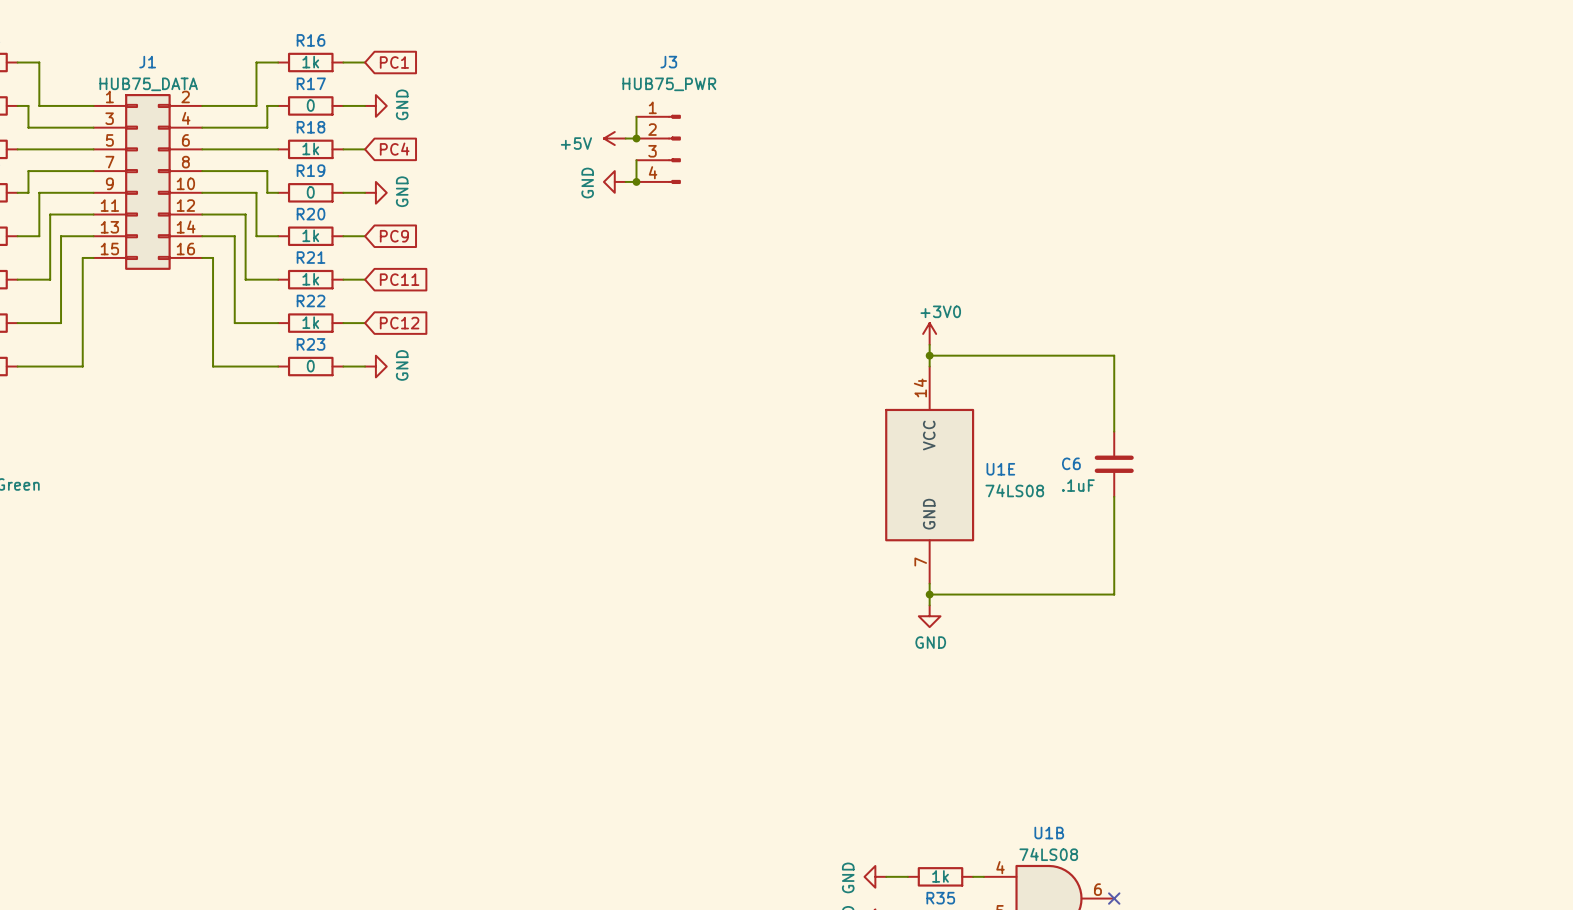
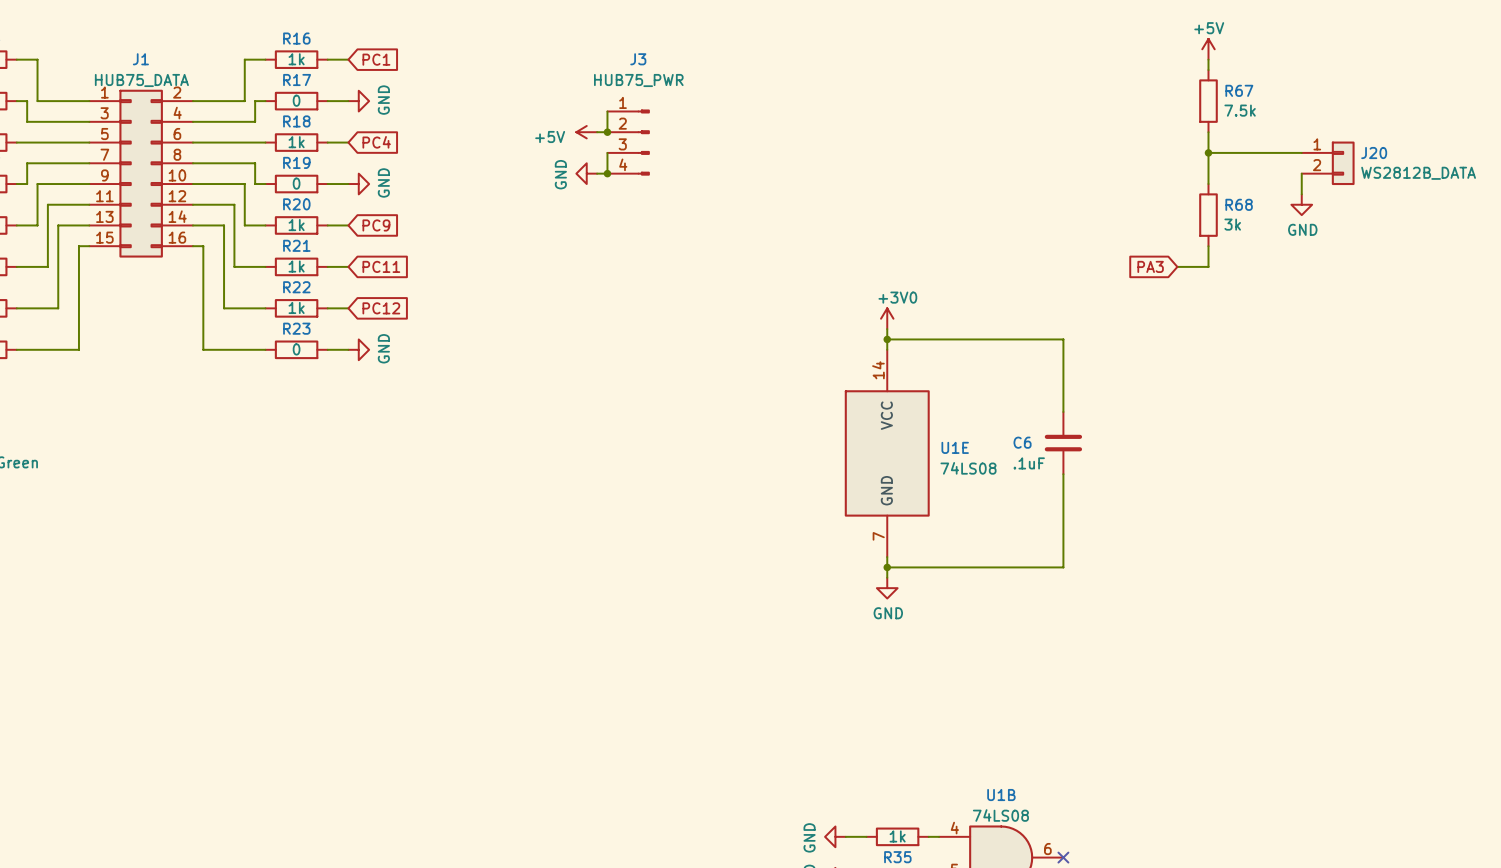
power symbol: none -> +5V (1208, 49)
wire: none -> (1208, 59) (1208, 70)
R67: none -> 7.5k (1208, 101)
wire: none -> (1208, 132) (1208, 184)
wire: none -> (1208, 152) (1301, 152)
junction: none -> (1208, 152)
J20: none -> WS2812B_DATA (1328, 163)
wire: none -> (1301, 173) (1301, 194)
power symbol: none -> GND (1301, 204)
R68: none -> 3k (1208, 215)
wire: none -> (1208, 246) (1208, 266) (1177, 266)
global label: none -> PA3 (1150, 266)

